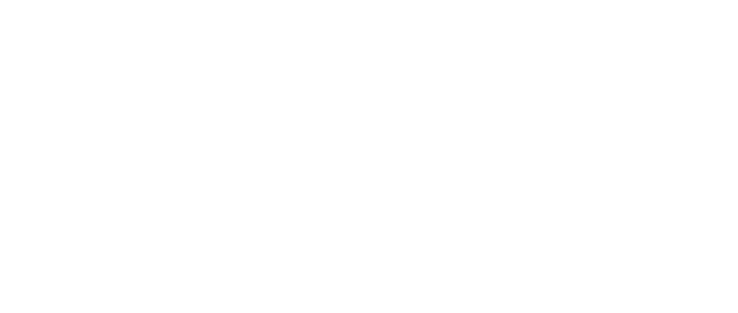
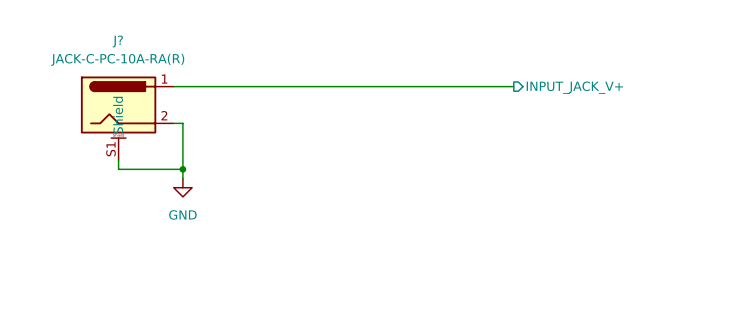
wire: none -> (173, 86) (513, 86)
sheet pin: none -> INPUT_JACK_V+ (574, 87)
J?: none -> JACK-C-PC-10A-RA(R) (127, 118)
wire: none -> (173, 123) (182, 123) (182, 178)
wire: none -> (118, 160) (118, 169) (182, 169)
junction: none -> (182, 169)
power symbol: none -> GND (182, 187)

